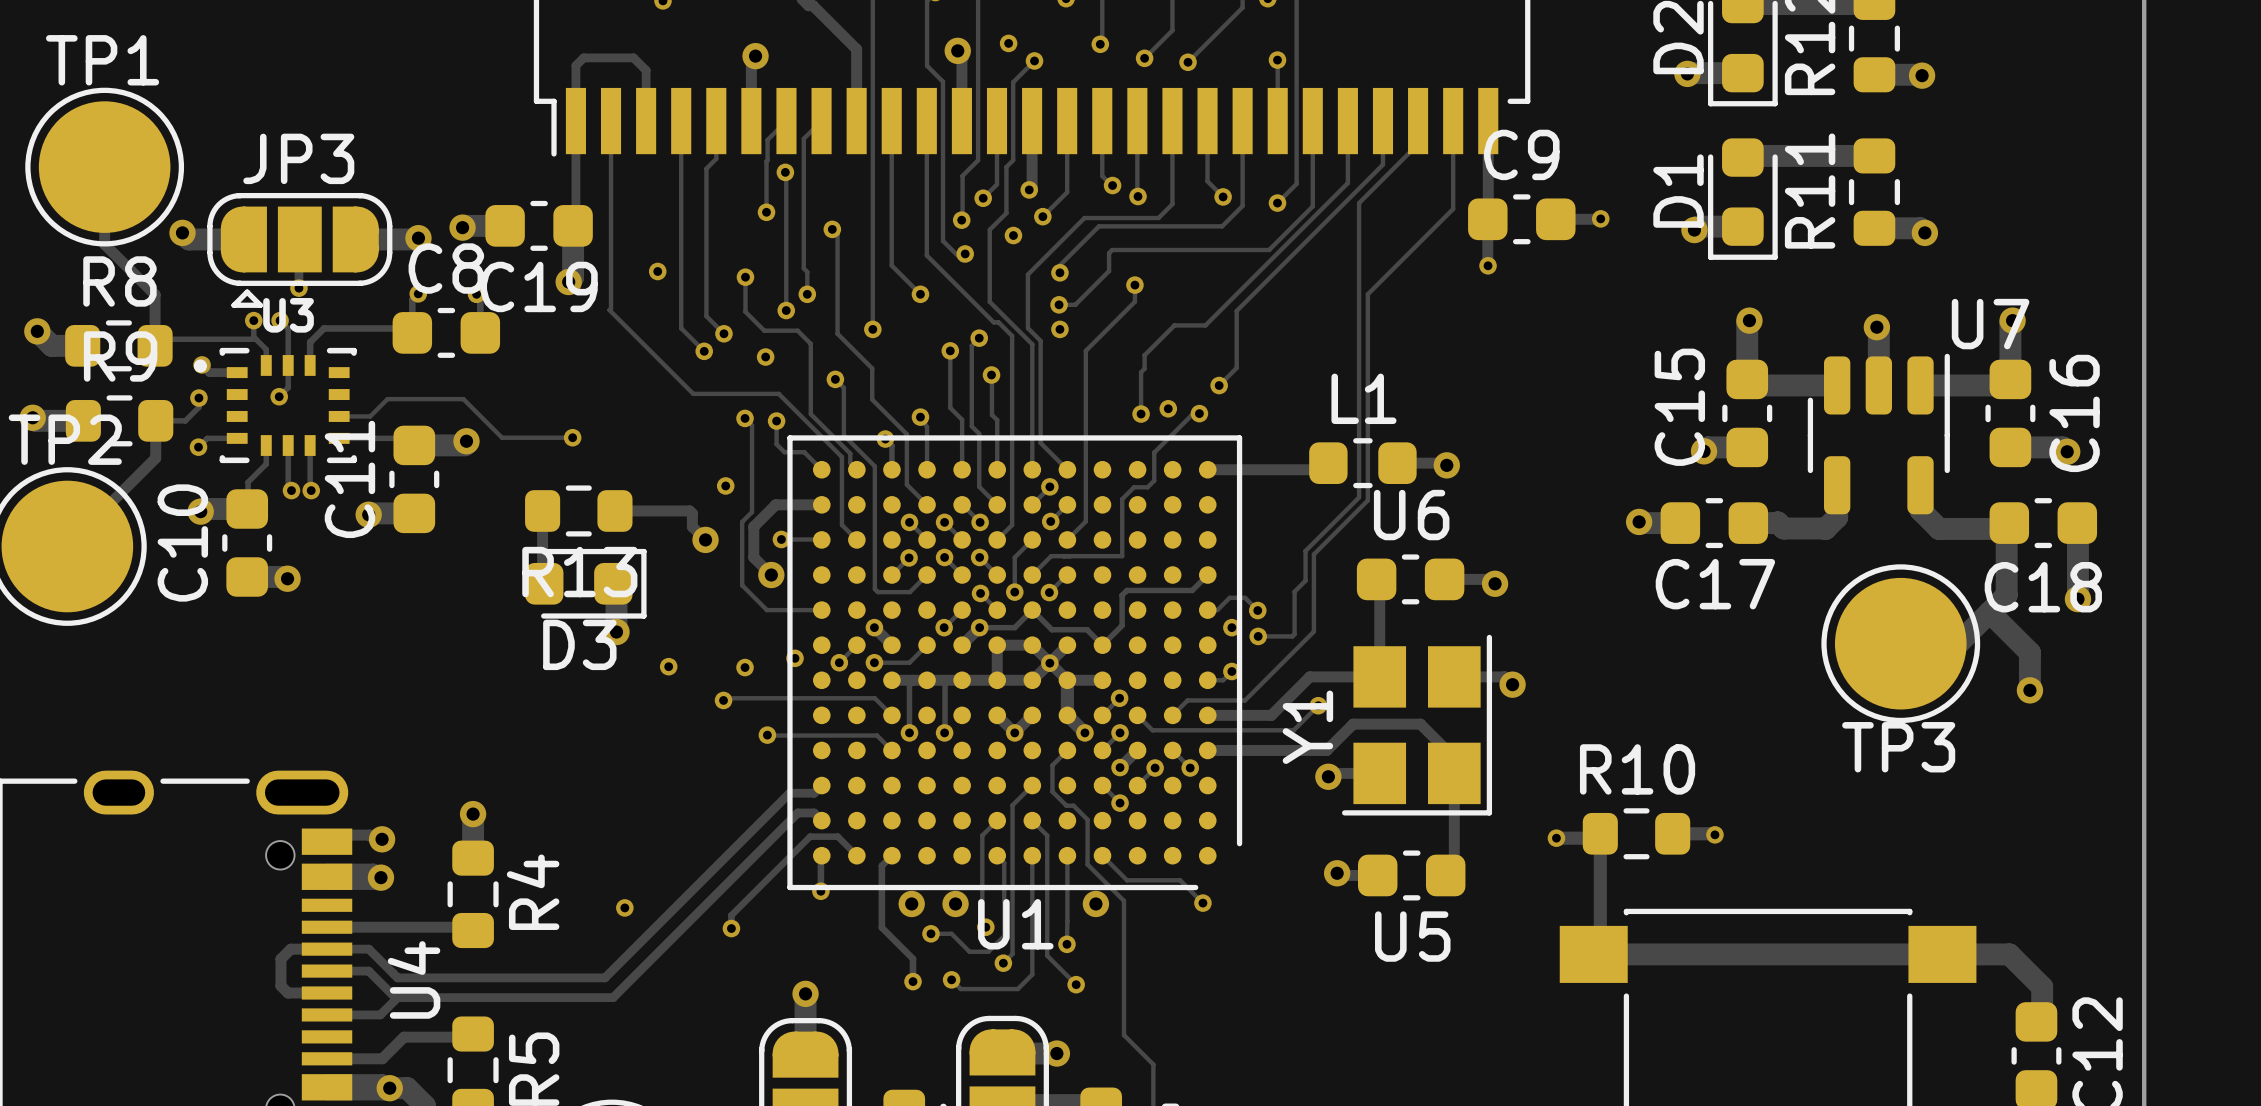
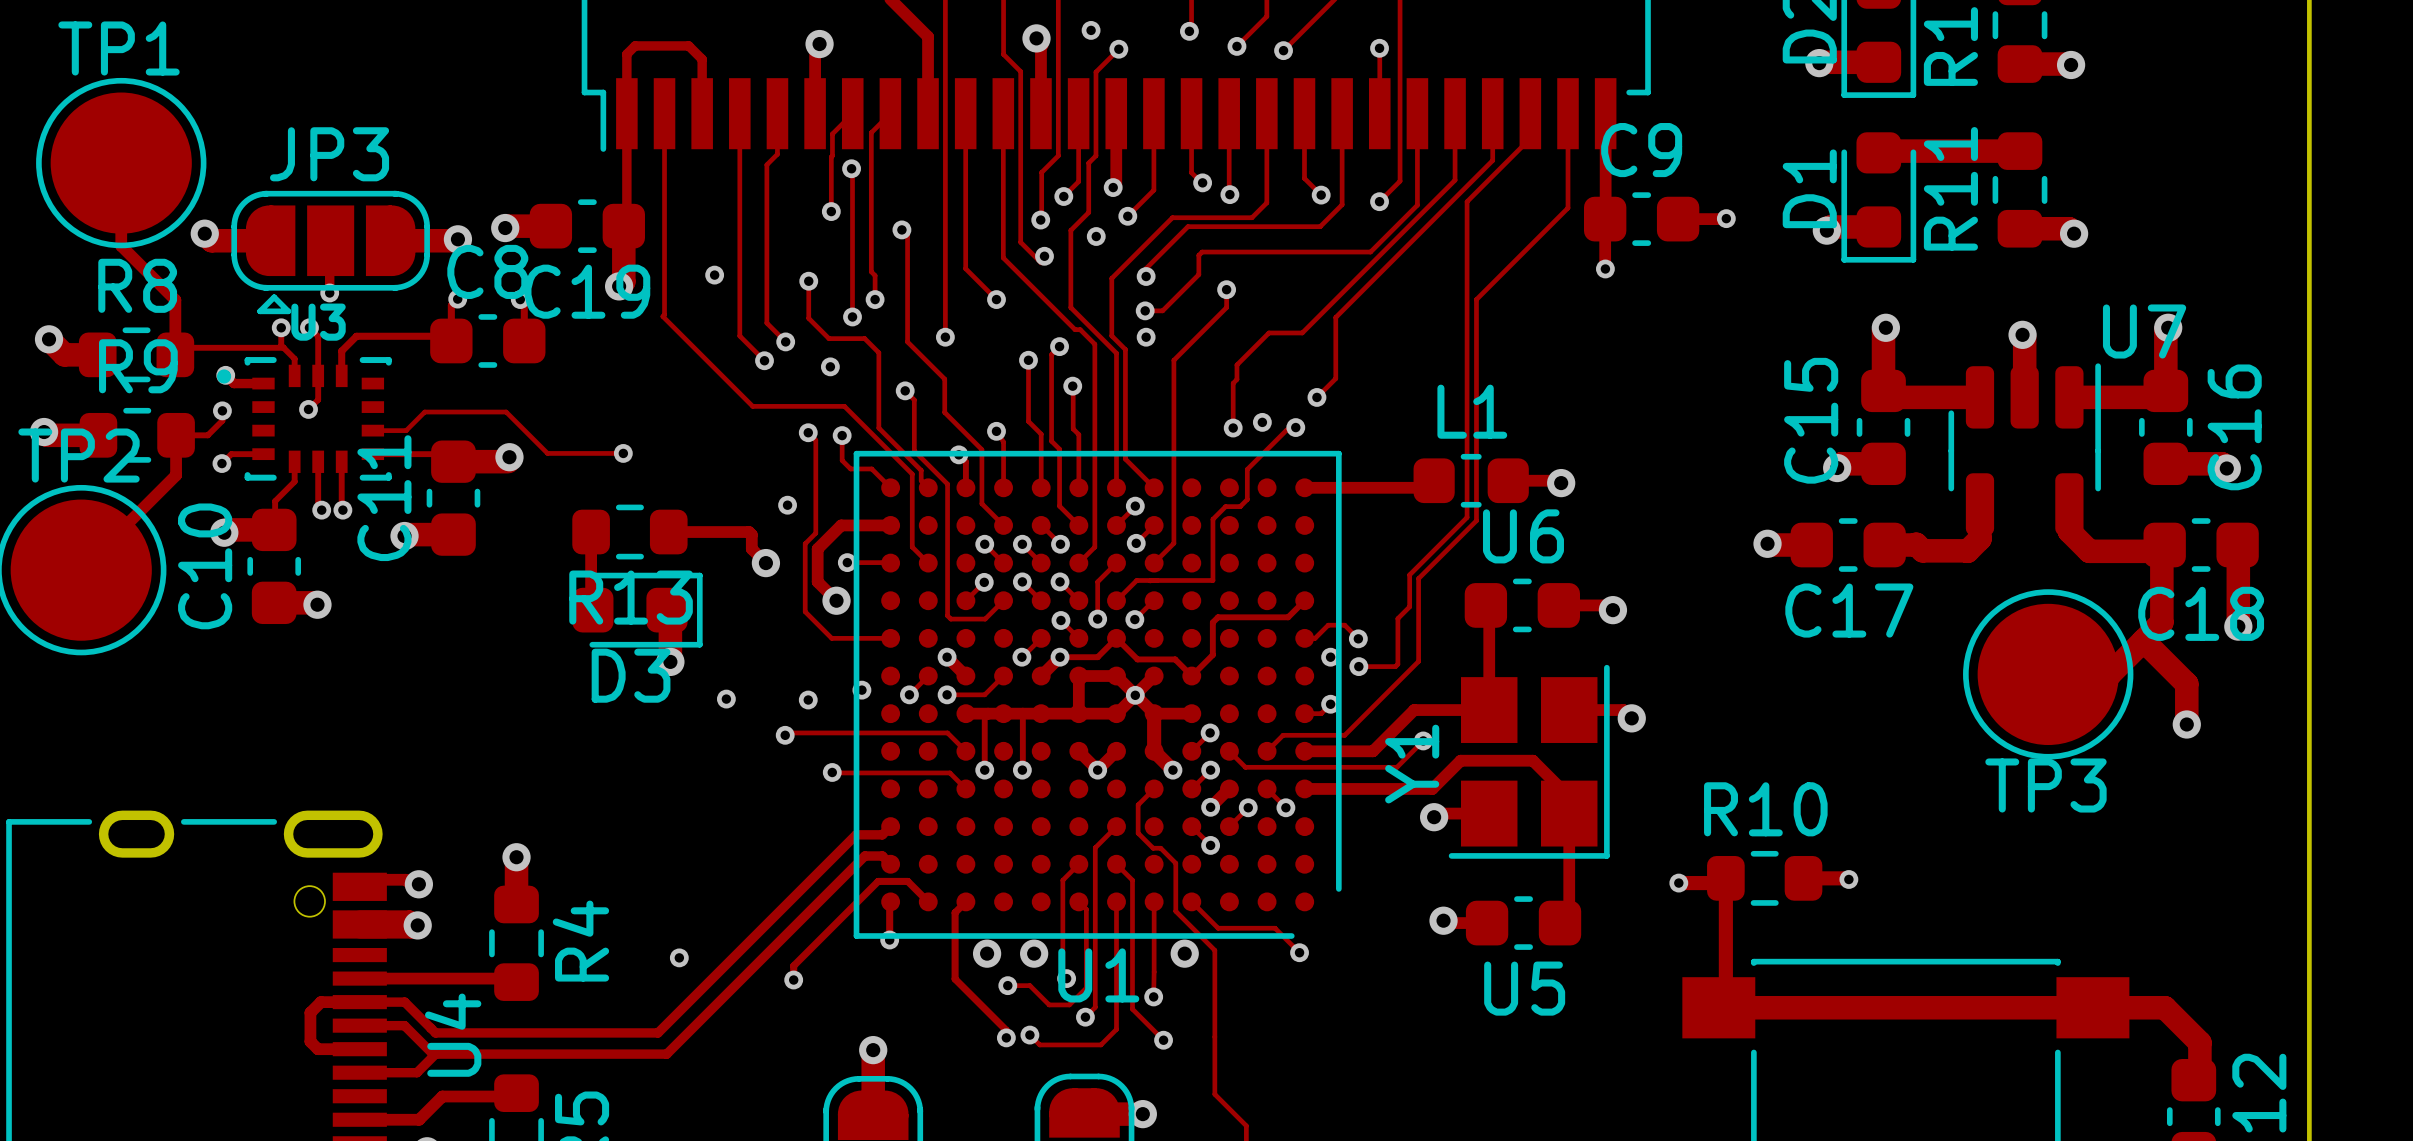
track: (913, 958) (913, 981) -> (988, 1012) (1006, 1030) (1006, 1037)
via position: (913, 981) -> (1006, 1037)

